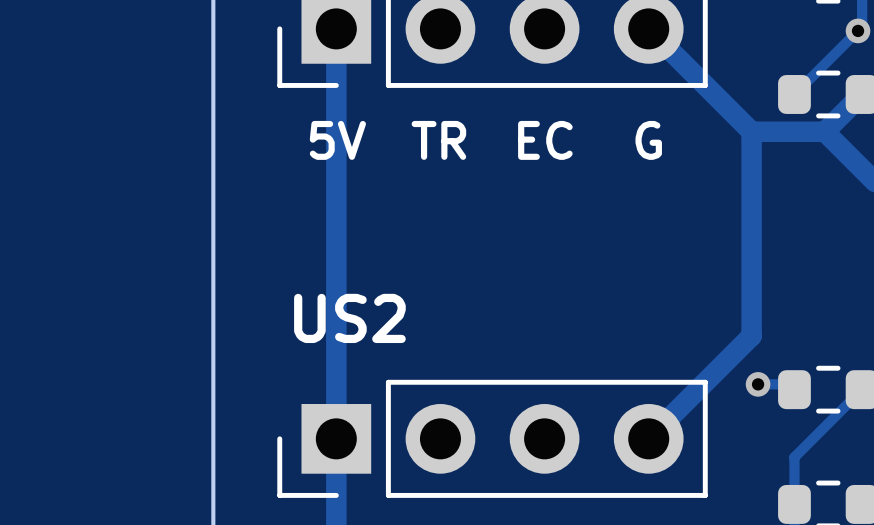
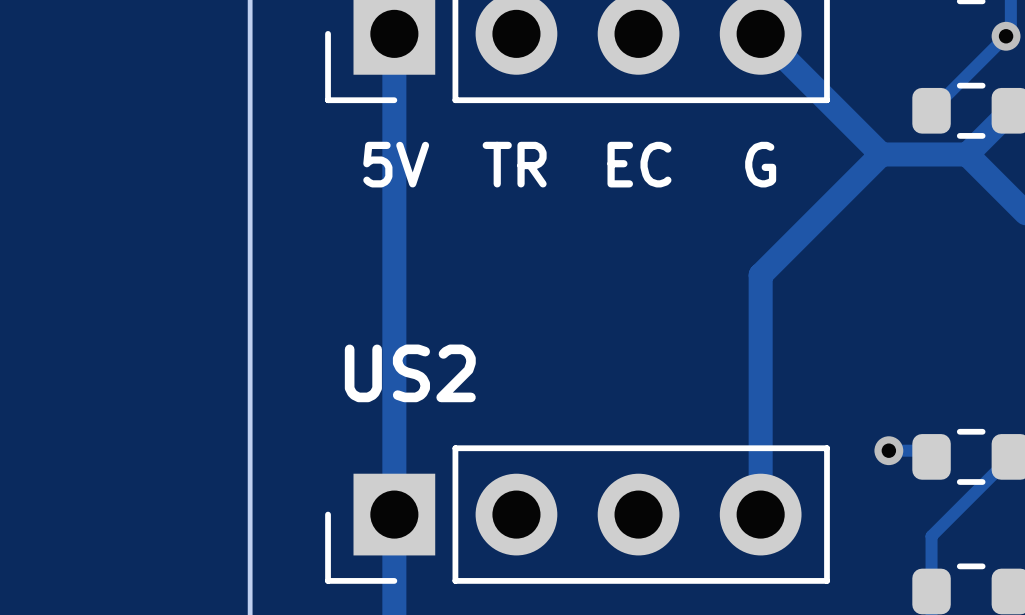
track: (751, 131) (751, 335) (648, 438) -> (881, 154) (760, 275) (760, 514)

